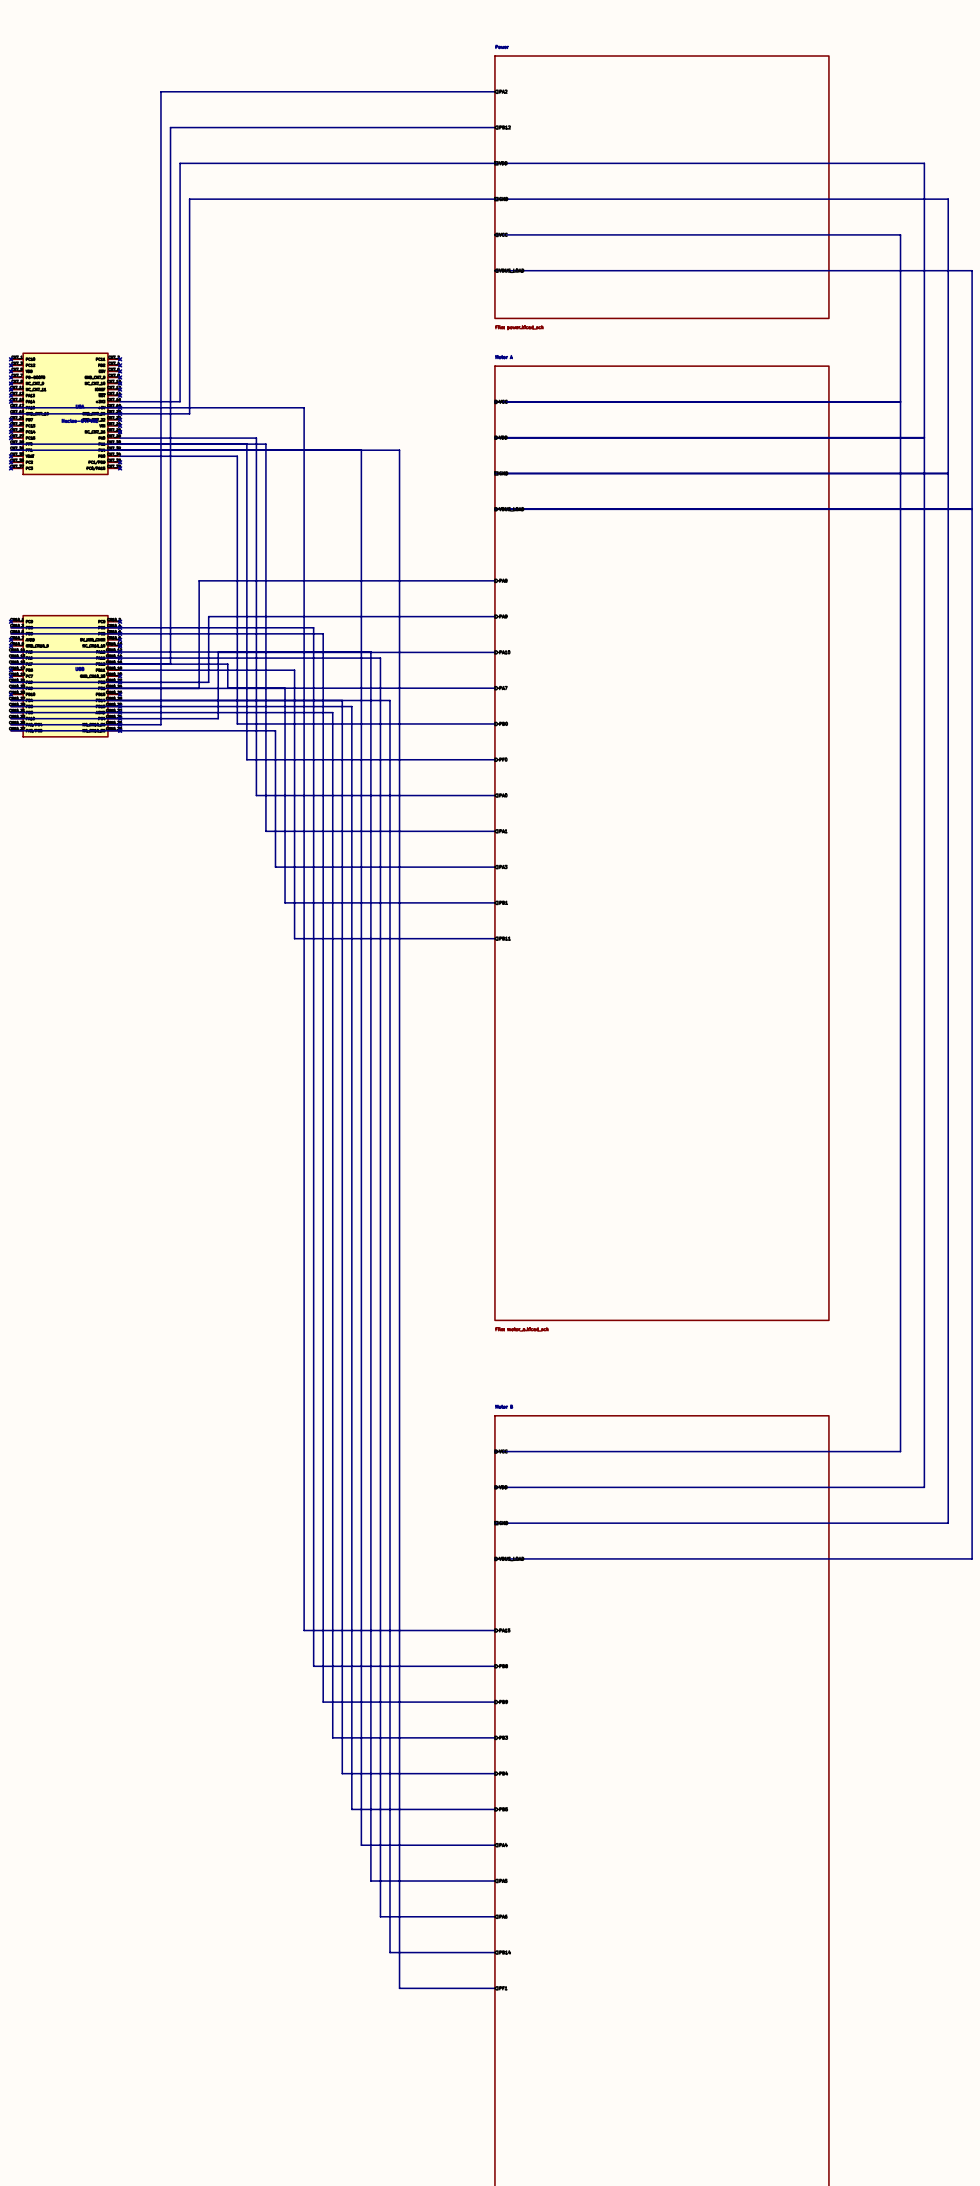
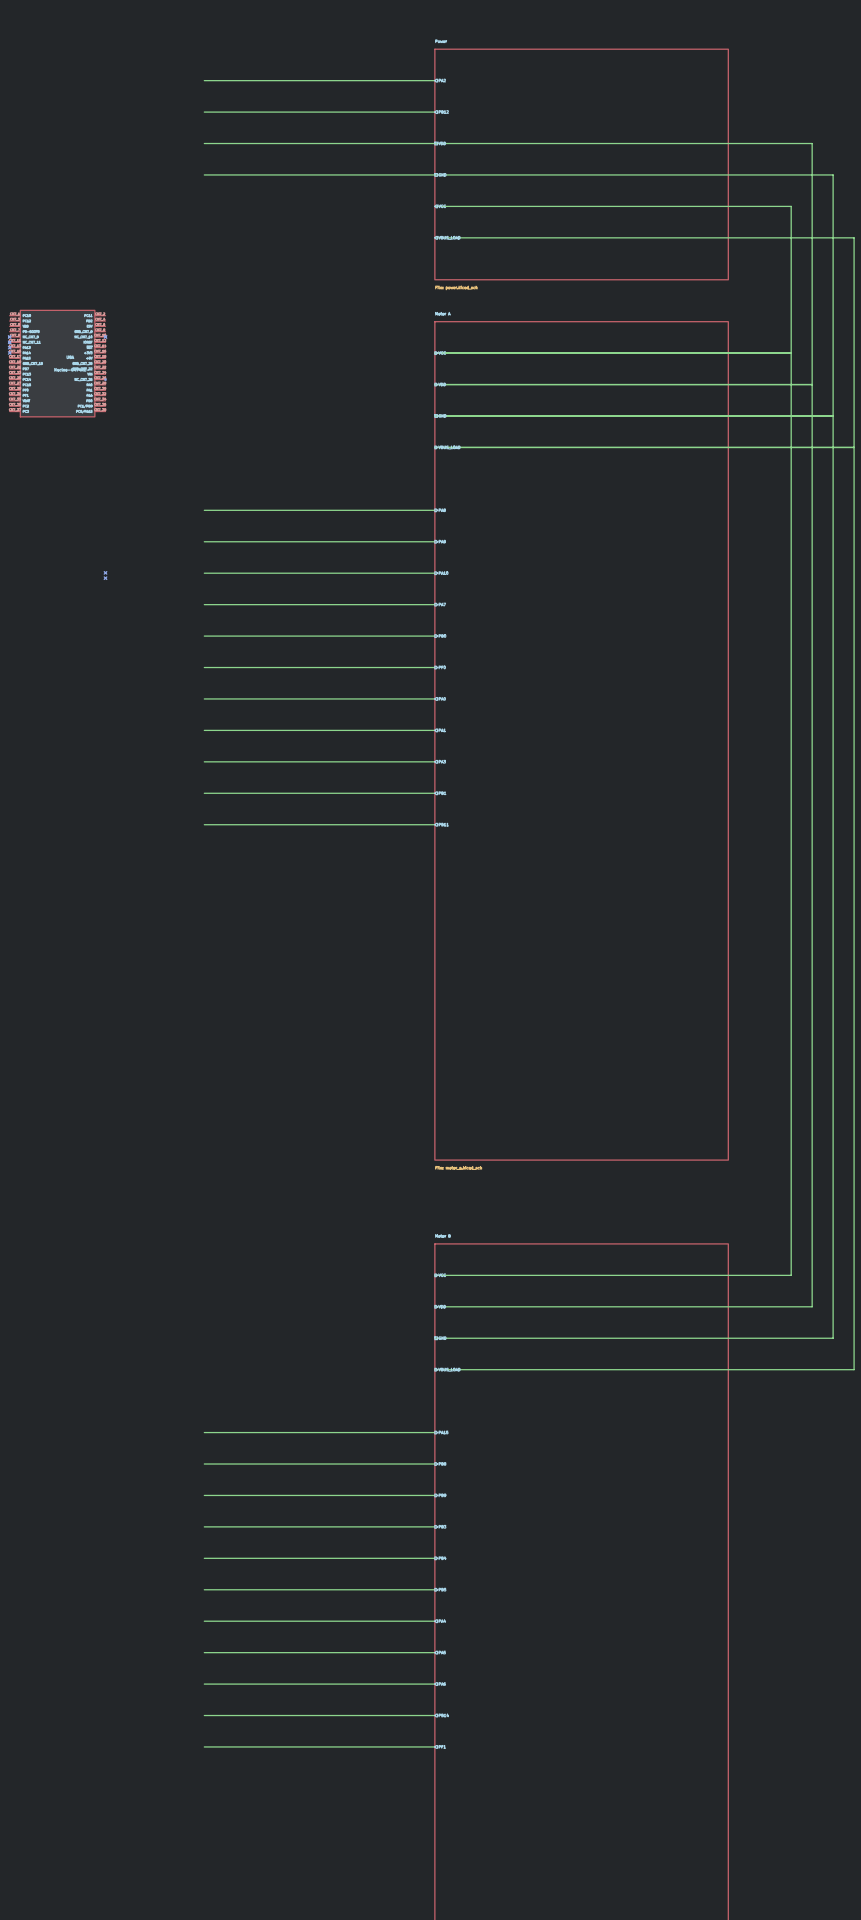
wire: (232, 91) (160, 91) (160, 724) (11, 724) -> none
wire: (232, 127) (170, 127) (170, 664) -> none
wire: (232, 163) (180, 163) (180, 401) (120, 401) -> none
wire: (232, 199) (189, 199) (189, 413) (11, 413) -> none
no-connect mark: (11, 359) -> none
no-connect mark: (120, 359) -> none
no-connect mark: (11, 365) -> none
no-connect mark: (120, 365) -> none
no-connect mark: (11, 371) -> none
no-connect mark: (120, 371) -> none
no-connect mark: (11, 377) -> none
no-connect mark: (120, 377) -> none
no-connect mark: (120, 389) -> none
no-connect mark: (120, 395) -> none
wire: (11, 407) (304, 407) (304, 1630) -> (204, 1432) (267, 1432)
no-connect mark: (120, 407) -> none
no-connect mark: (120, 413) -> none
no-connect mark: (11, 419) -> none
no-connect mark: (120, 419) -> none
no-connect mark: (11, 425) -> none
no-connect mark: (120, 425) -> none
no-connect mark: (11, 432) -> none
no-connect mark: (120, 432) -> none
no-connect mark: (11, 438) -> none
wire: (120, 438) (256, 438) (256, 795) -> (204, 698) (225, 698)
wire: (11, 444) (265, 444) (265, 831) -> (204, 730) (233, 730)
wire: (246, 444) (246, 759) -> (204, 667) (216, 667)
wire: (11, 450) (399, 450) (399, 1988) -> (204, 1746) (351, 1746)
wire: (361, 450) (361, 1845) -> (204, 1621) (317, 1621)
no-connect mark: (11, 456) -> none
wire: (120, 456) (237, 456) (237, 723) -> (204, 636) (208, 636)
no-connect mark: (11, 462) -> none
no-connect mark: (120, 462) -> none
no-connect mark: (11, 468) -> none
no-connect mark: (120, 468) -> none
wire: (232, 580) (199, 580) (199, 688) -> none
wire: (232, 616) (208, 616) (208, 682) (11, 682) -> none
no-connect mark: (11, 621) -> none
no-connect mark: (120, 621) -> none
wire: (11, 627) (313, 627) (313, 1666) -> (204, 1464) (275, 1464)
no-connect mark: (120, 627) -> none
wire: (11, 633) (323, 633) (323, 1702) -> (204, 1495) (283, 1495)
no-connect mark: (120, 633) -> none
no-connect mark: (11, 639) -> none
no-connect mark: (120, 639) -> none
no-connect mark: (11, 645) -> none
no-connect mark: (120, 645) -> none
wire: (11, 652) (370, 652) (370, 1881) -> (204, 1652) (325, 1652)
wire: (232, 652) (218, 652) (218, 718) (11, 718) -> none
wire: (11, 658) (380, 658) (380, 1916) -> (204, 1684) (334, 1684)
wire: (11, 664) (227, 664) (227, 688) (232, 688) -> none
no-connect mark: (11, 670) -> none
wire: (120, 670) (294, 670) (294, 938) -> (204, 824) (258, 824)
no-connect mark: (11, 676) -> none
part: (65, 676) -> none
no-connect mark: (120, 676) -> none
no-connect mark: (120, 682) -> none
wire: (11, 688) (285, 688) (285, 902) -> (204, 793) (250, 793)
no-connect mark: (11, 694) -> none
no-connect mark: (120, 694) -> none
wire: (11, 700) (389, 700) (389, 1952) -> (204, 1715) (342, 1715)
wire: (342, 700) (342, 1773) -> (204, 1558) (300, 1558)
wire: (11, 706) (351, 706) (351, 1809) -> (204, 1589) (309, 1589)
no-connect mark: (120, 706) -> none
wire: (11, 712) (332, 712) (332, 1737) -> (204, 1526) (292, 1526)
no-connect mark: (120, 712) -> none
no-connect mark: (120, 718) -> none
no-connect mark: (120, 724) -> none
wire: (11, 730) (275, 730) (275, 867) -> (204, 761) (242, 761)
no-connect mark: (120, 730) -> none

